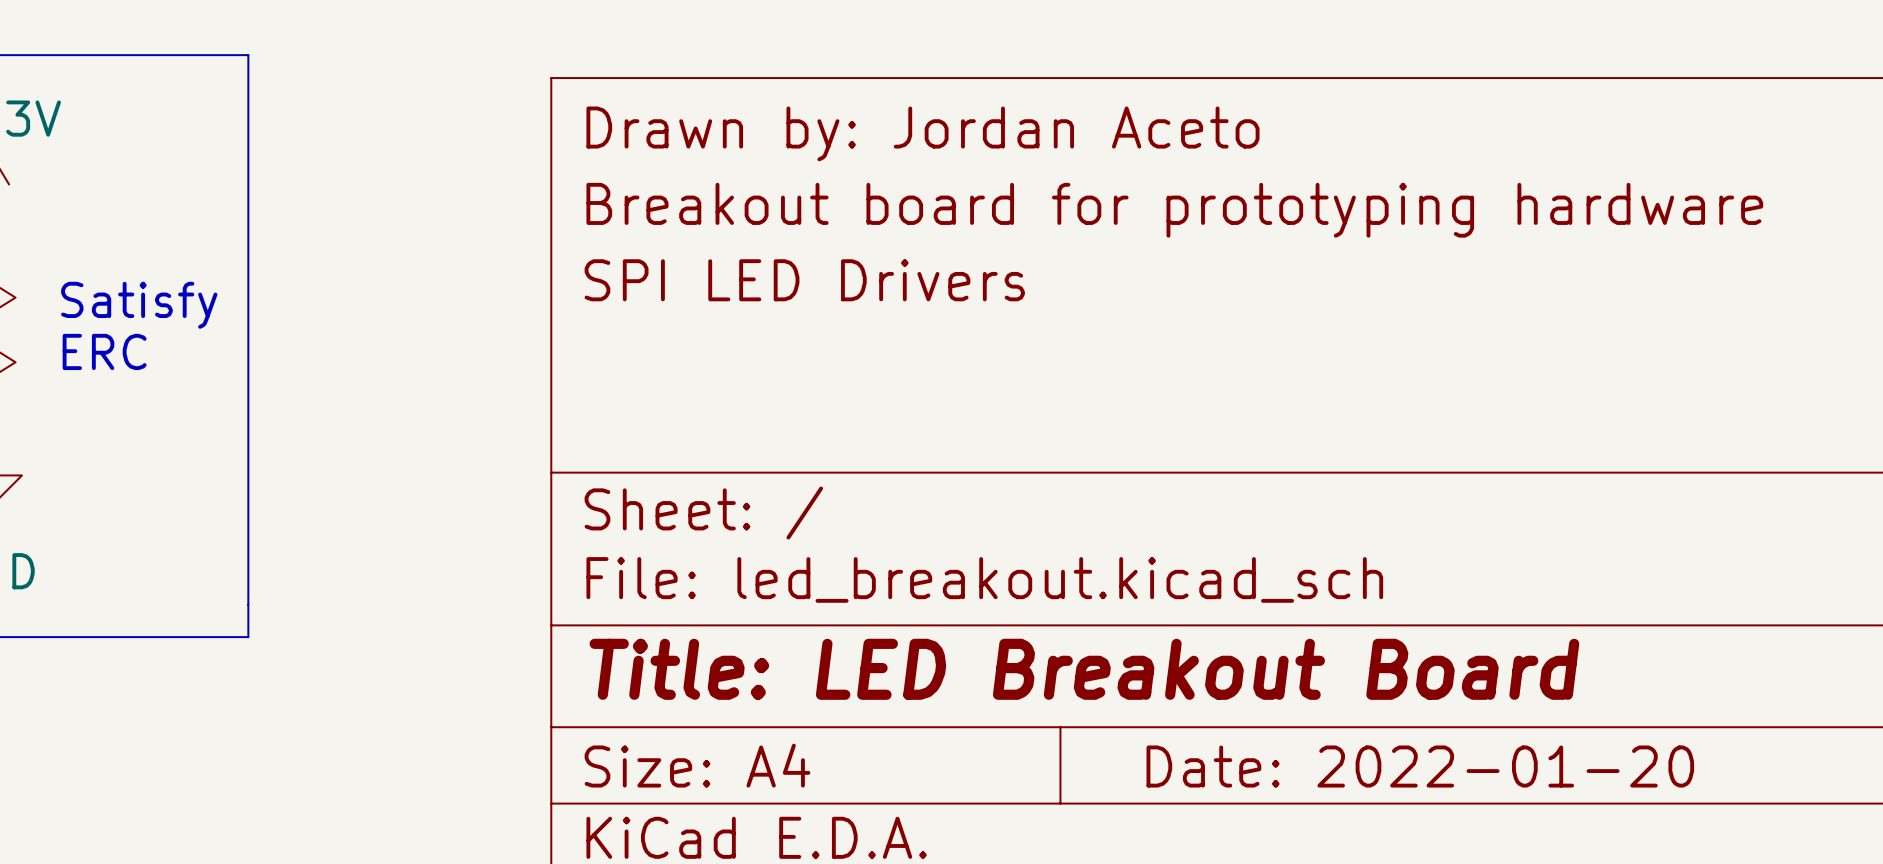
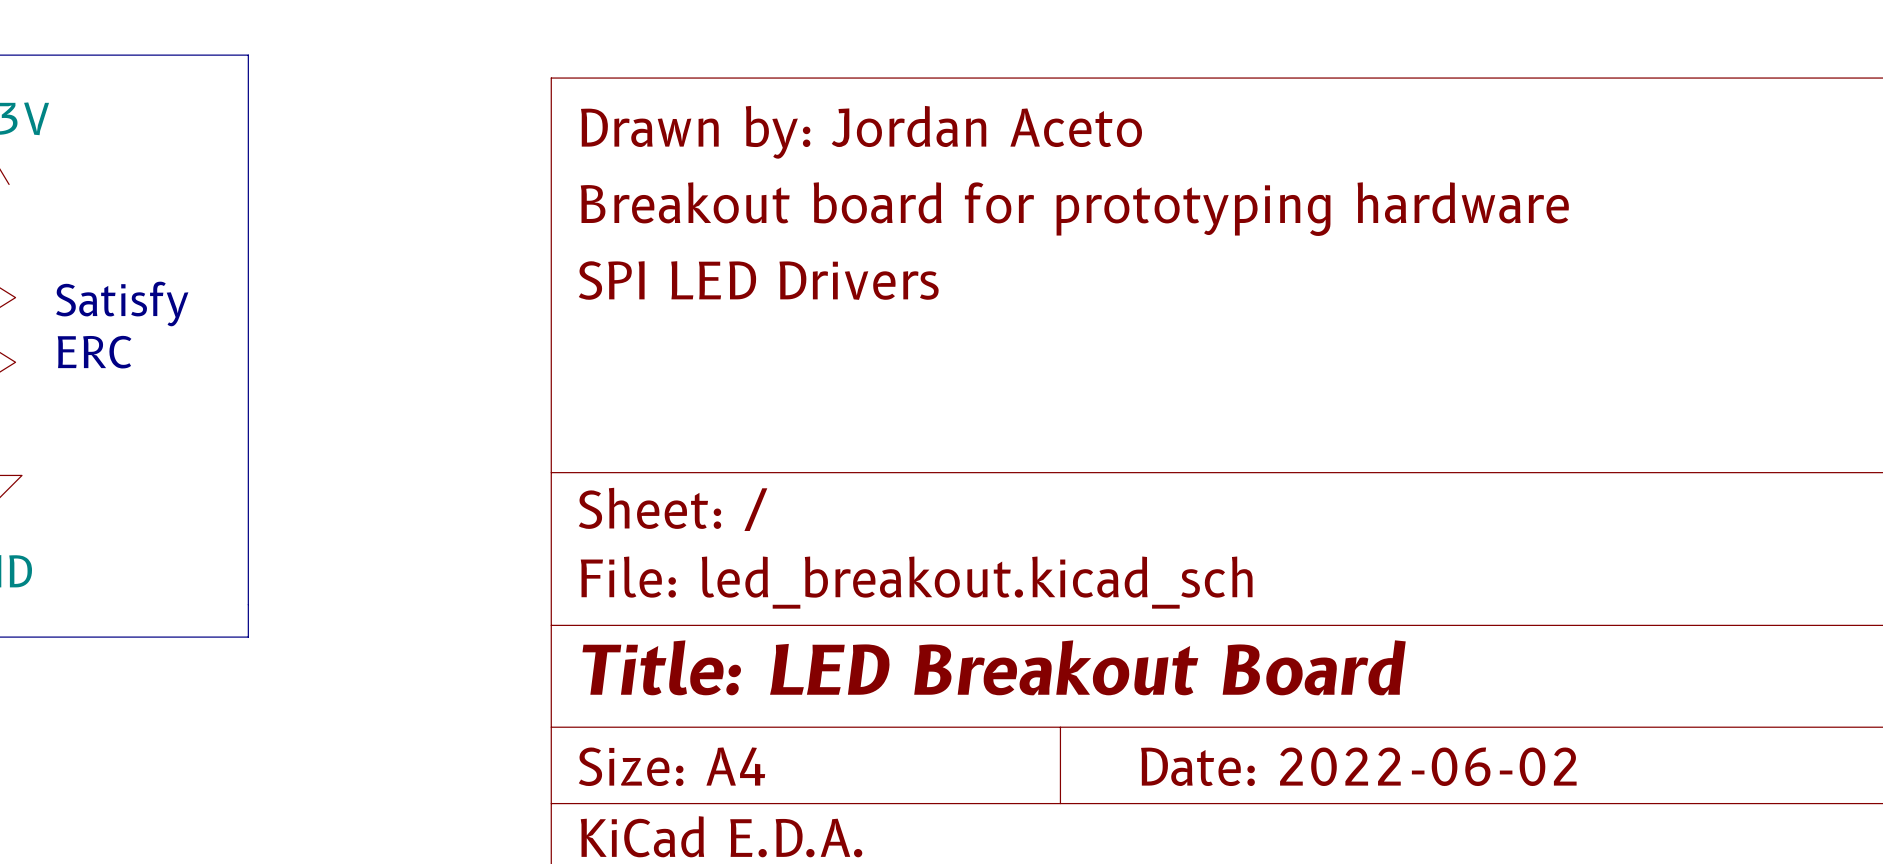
title block: Date: 2022-01-20 (1420, 766) -> Date: 2022-06-02 (1358, 766)

